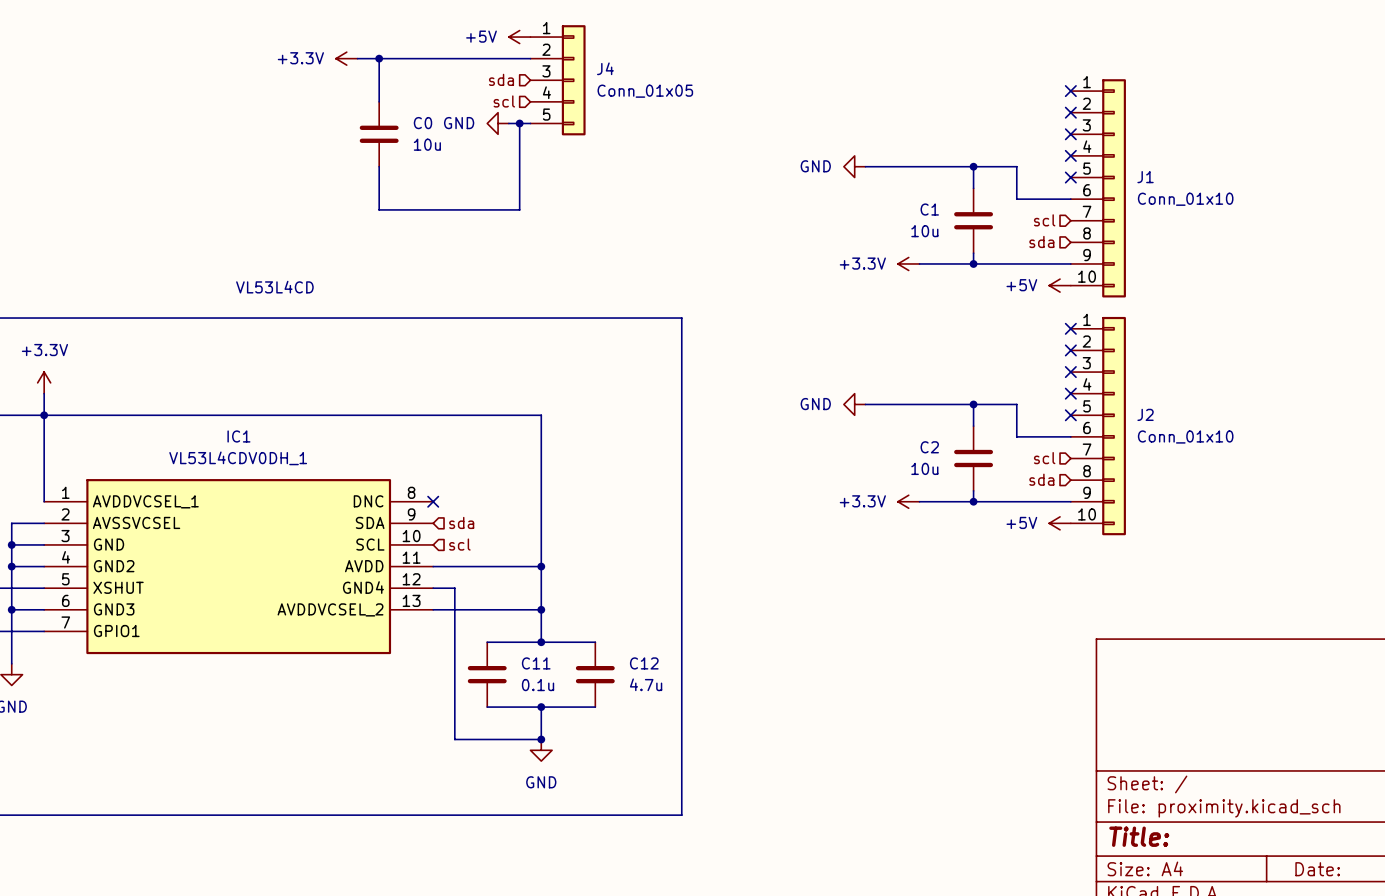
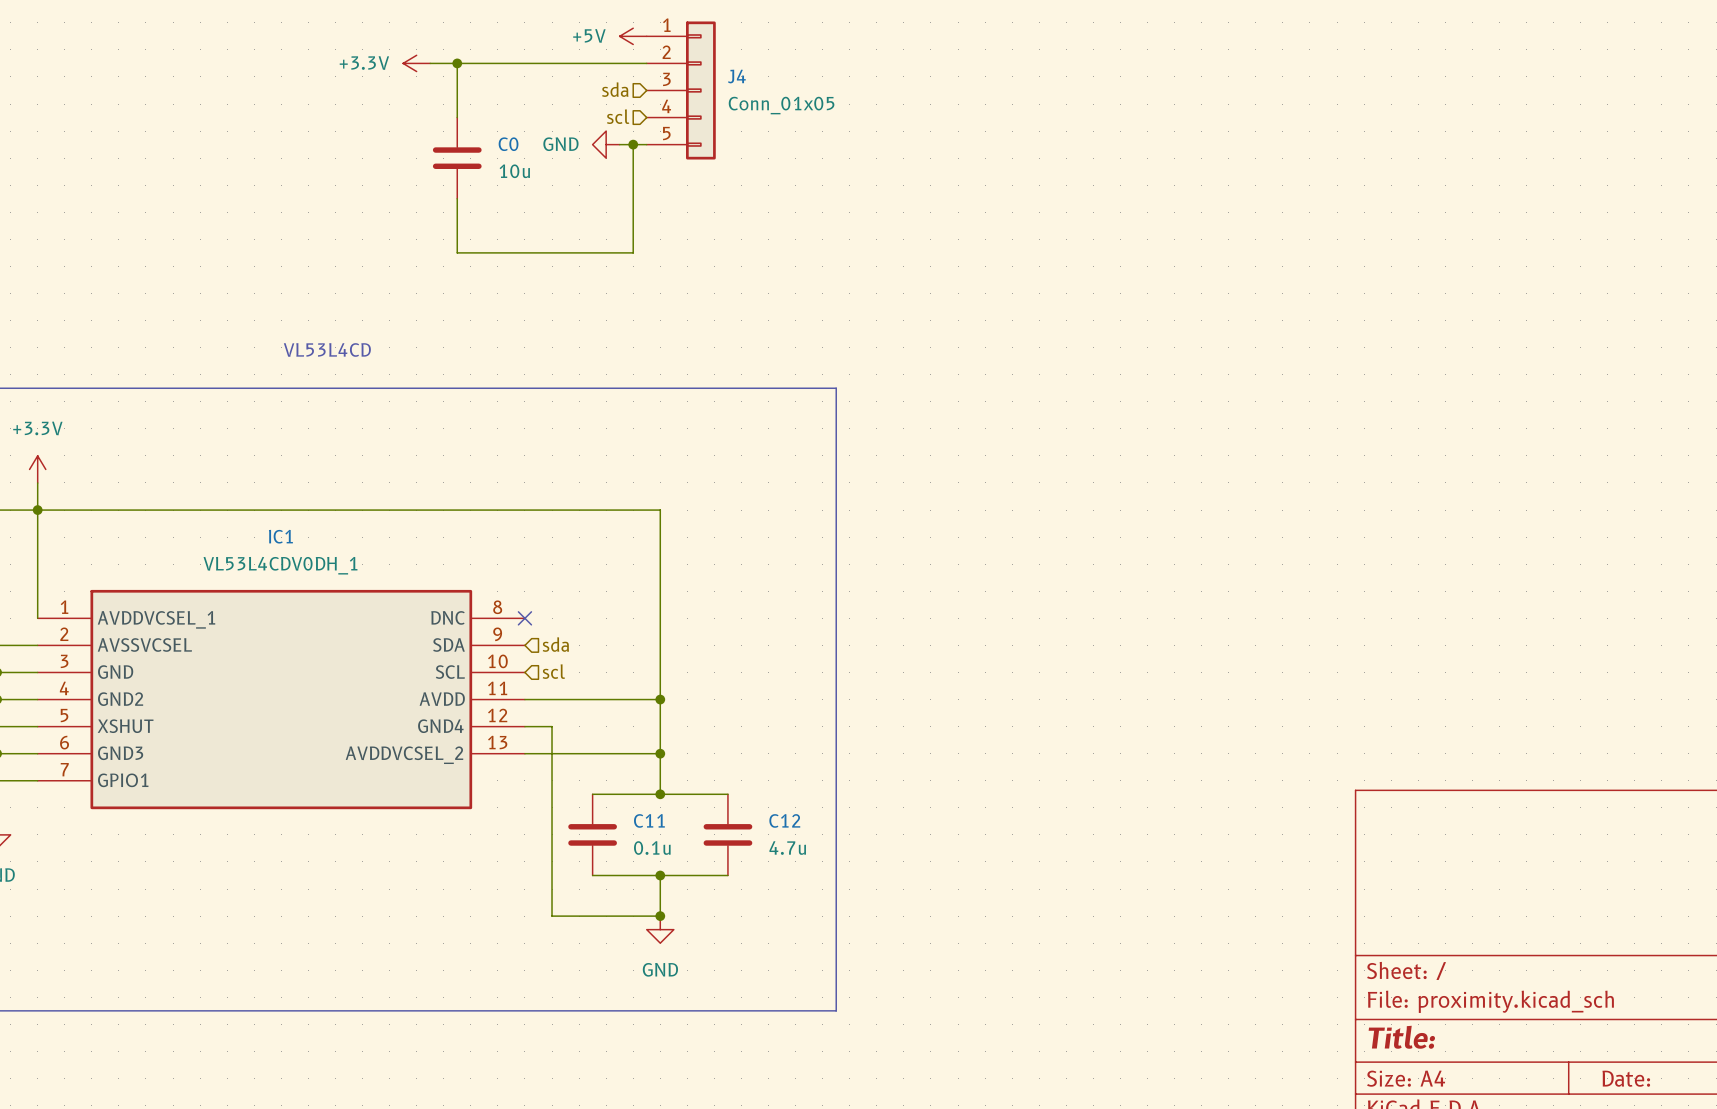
no-connect mark: (1070, 91) -> none
no-connect mark: (1070, 112) -> none
no-connect mark: (1070, 134) -> none
no-connect mark: (1070, 155) -> none
power symbol: GND (854, 166) -> none
wire: (865, 166) (1016, 166) (1016, 199) (1070, 199) -> none
wire: (973, 166) (973, 188) -> none
junction: (973, 166) -> none
no-connect mark: (1070, 177) -> none
J1: Conn_01x10 (1098, 188) -> none
C1: 10u (973, 220) -> none
hierarchical label: scl (1044, 220) -> none
hierarchical label: sda (1041, 241) -> none
wire: (973, 253) (973, 263) -> none
power symbol: +3.3V (908, 263) -> none
wire: (919, 263) (1070, 263) -> none
junction: (973, 263) -> none
power symbol: +5V (1060, 285) -> none
no-connect mark: (1070, 328) -> none
no-connect mark: (1070, 350) -> none
no-connect mark: (1070, 372) -> none
no-connect mark: (1070, 393) -> none
power symbol: GND (854, 404) -> none
wire: (865, 404) (1016, 404) (1016, 436) (1070, 436) -> none
wire: (973, 404) (973, 426) -> none
junction: (973, 404) -> none
no-connect mark: (1070, 415) -> none
J2: Conn_01x10 (1098, 426) -> none
C2: 10u (973, 458) -> none
hierarchical label: scl (1044, 458) -> none
hierarchical label: sda (1041, 479) -> none
wire: (973, 490) (973, 501) -> none
power symbol: +3.3V (908, 501) -> none
wire: (919, 501) (1070, 501) -> none
junction: (973, 501) -> none
power symbol: +5V (1060, 523) -> none

